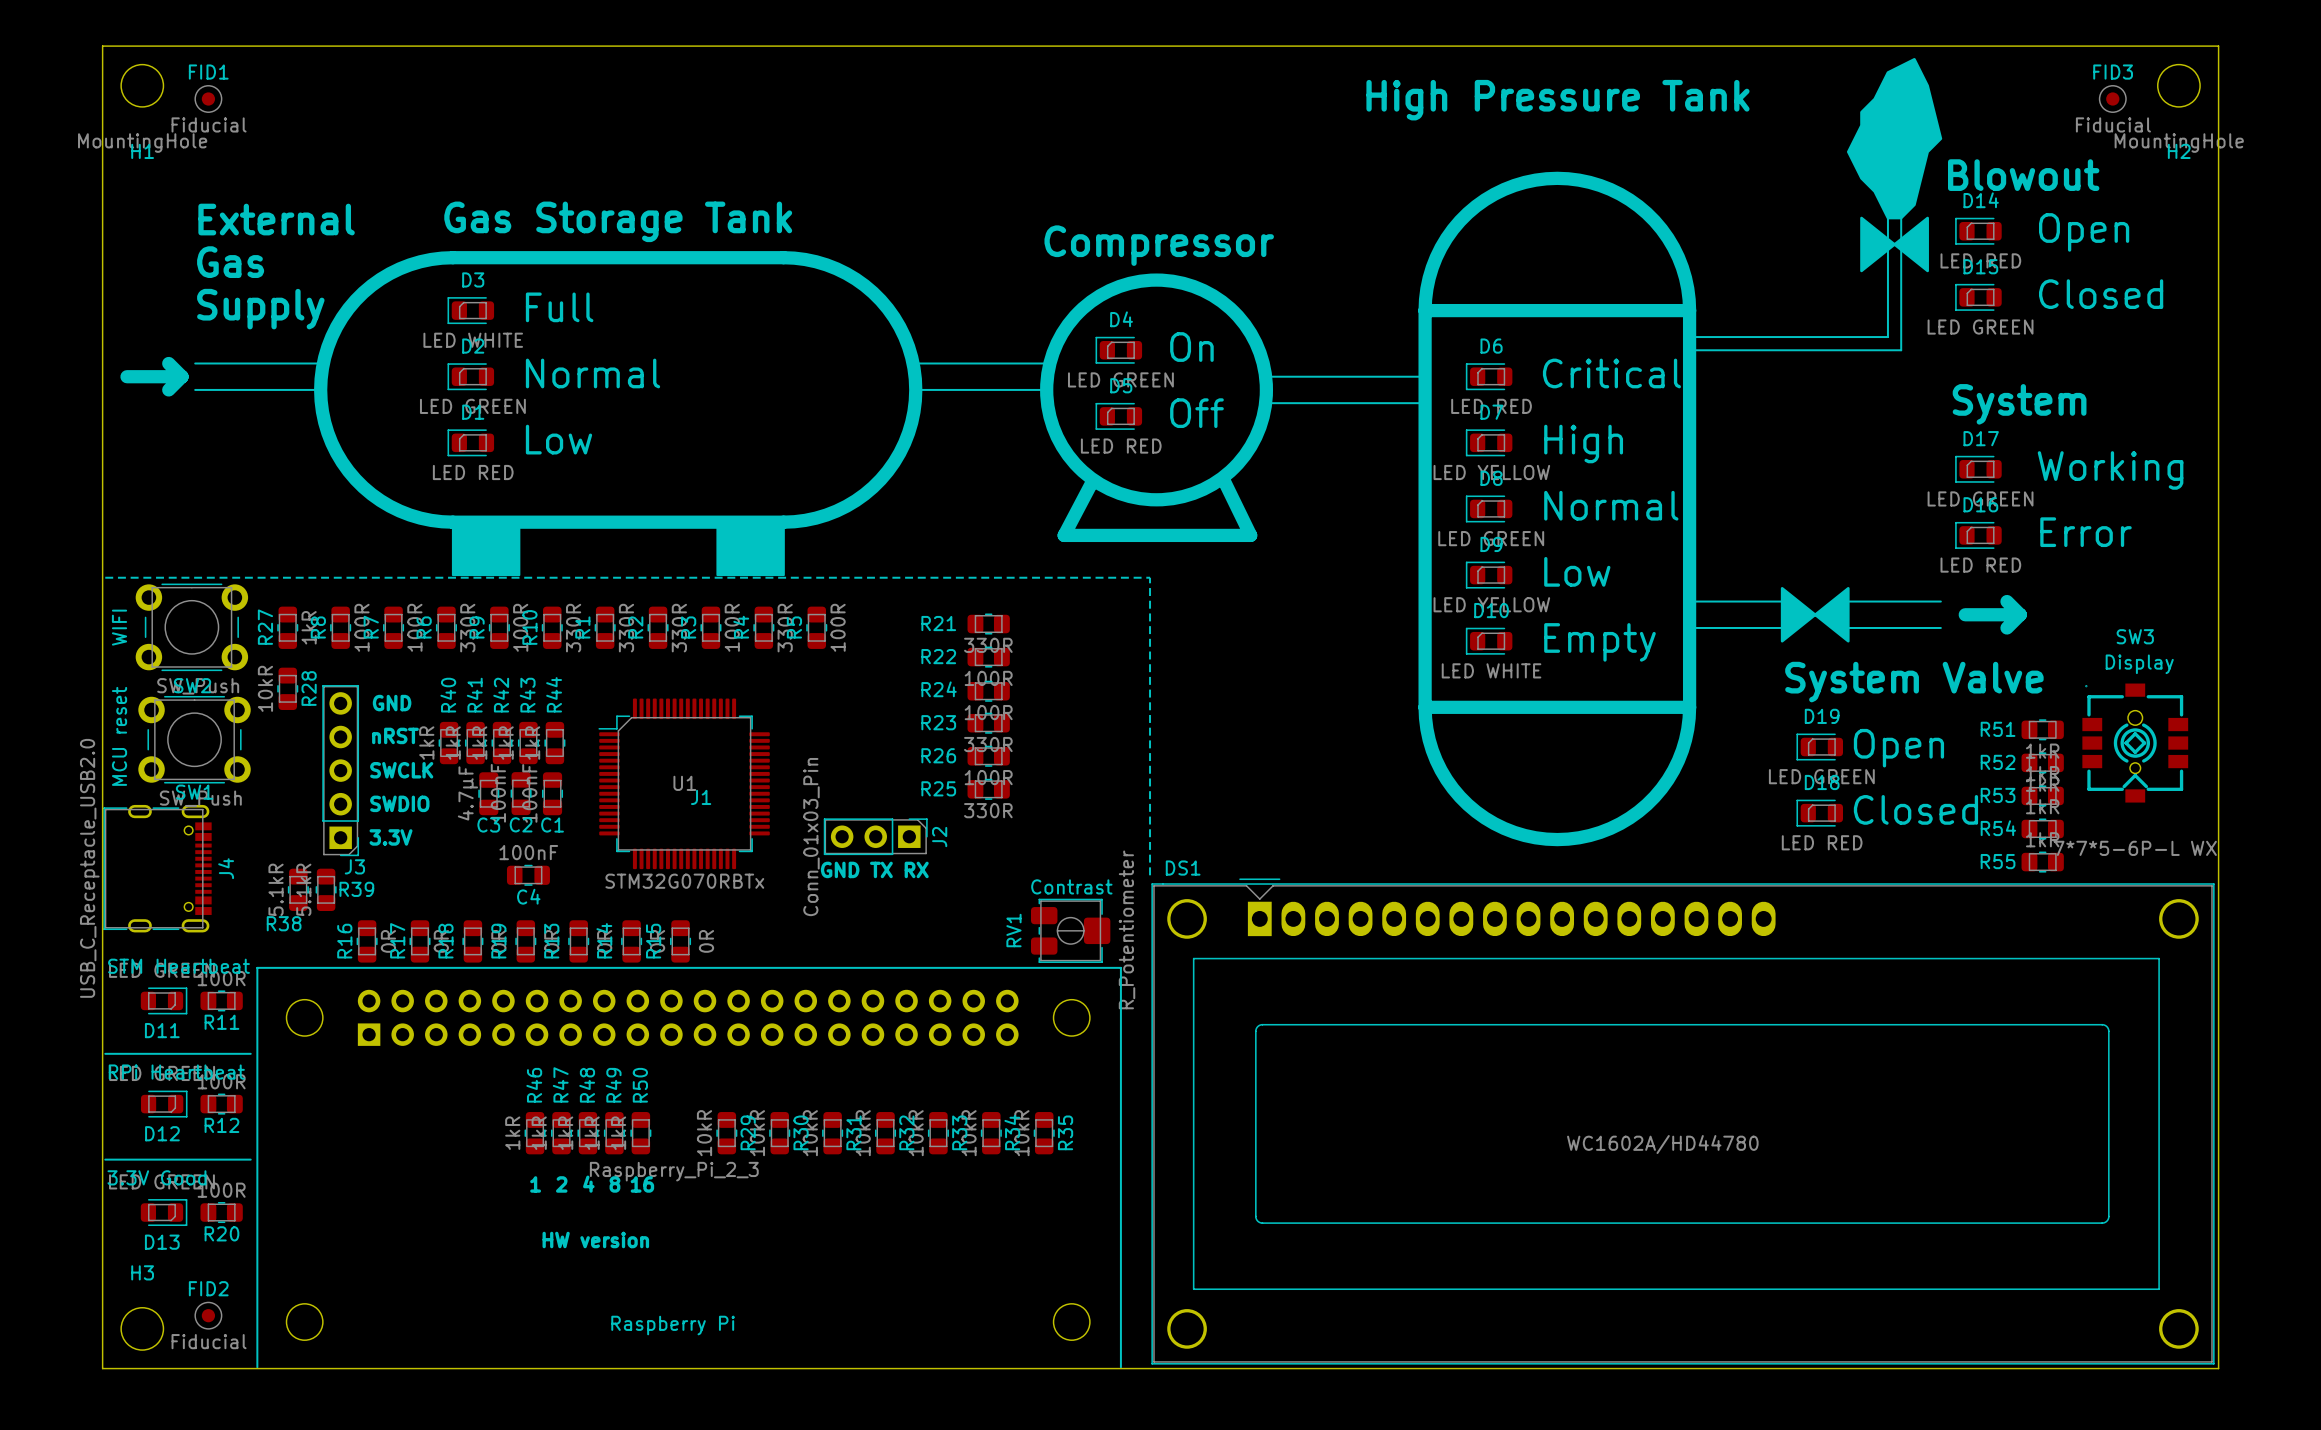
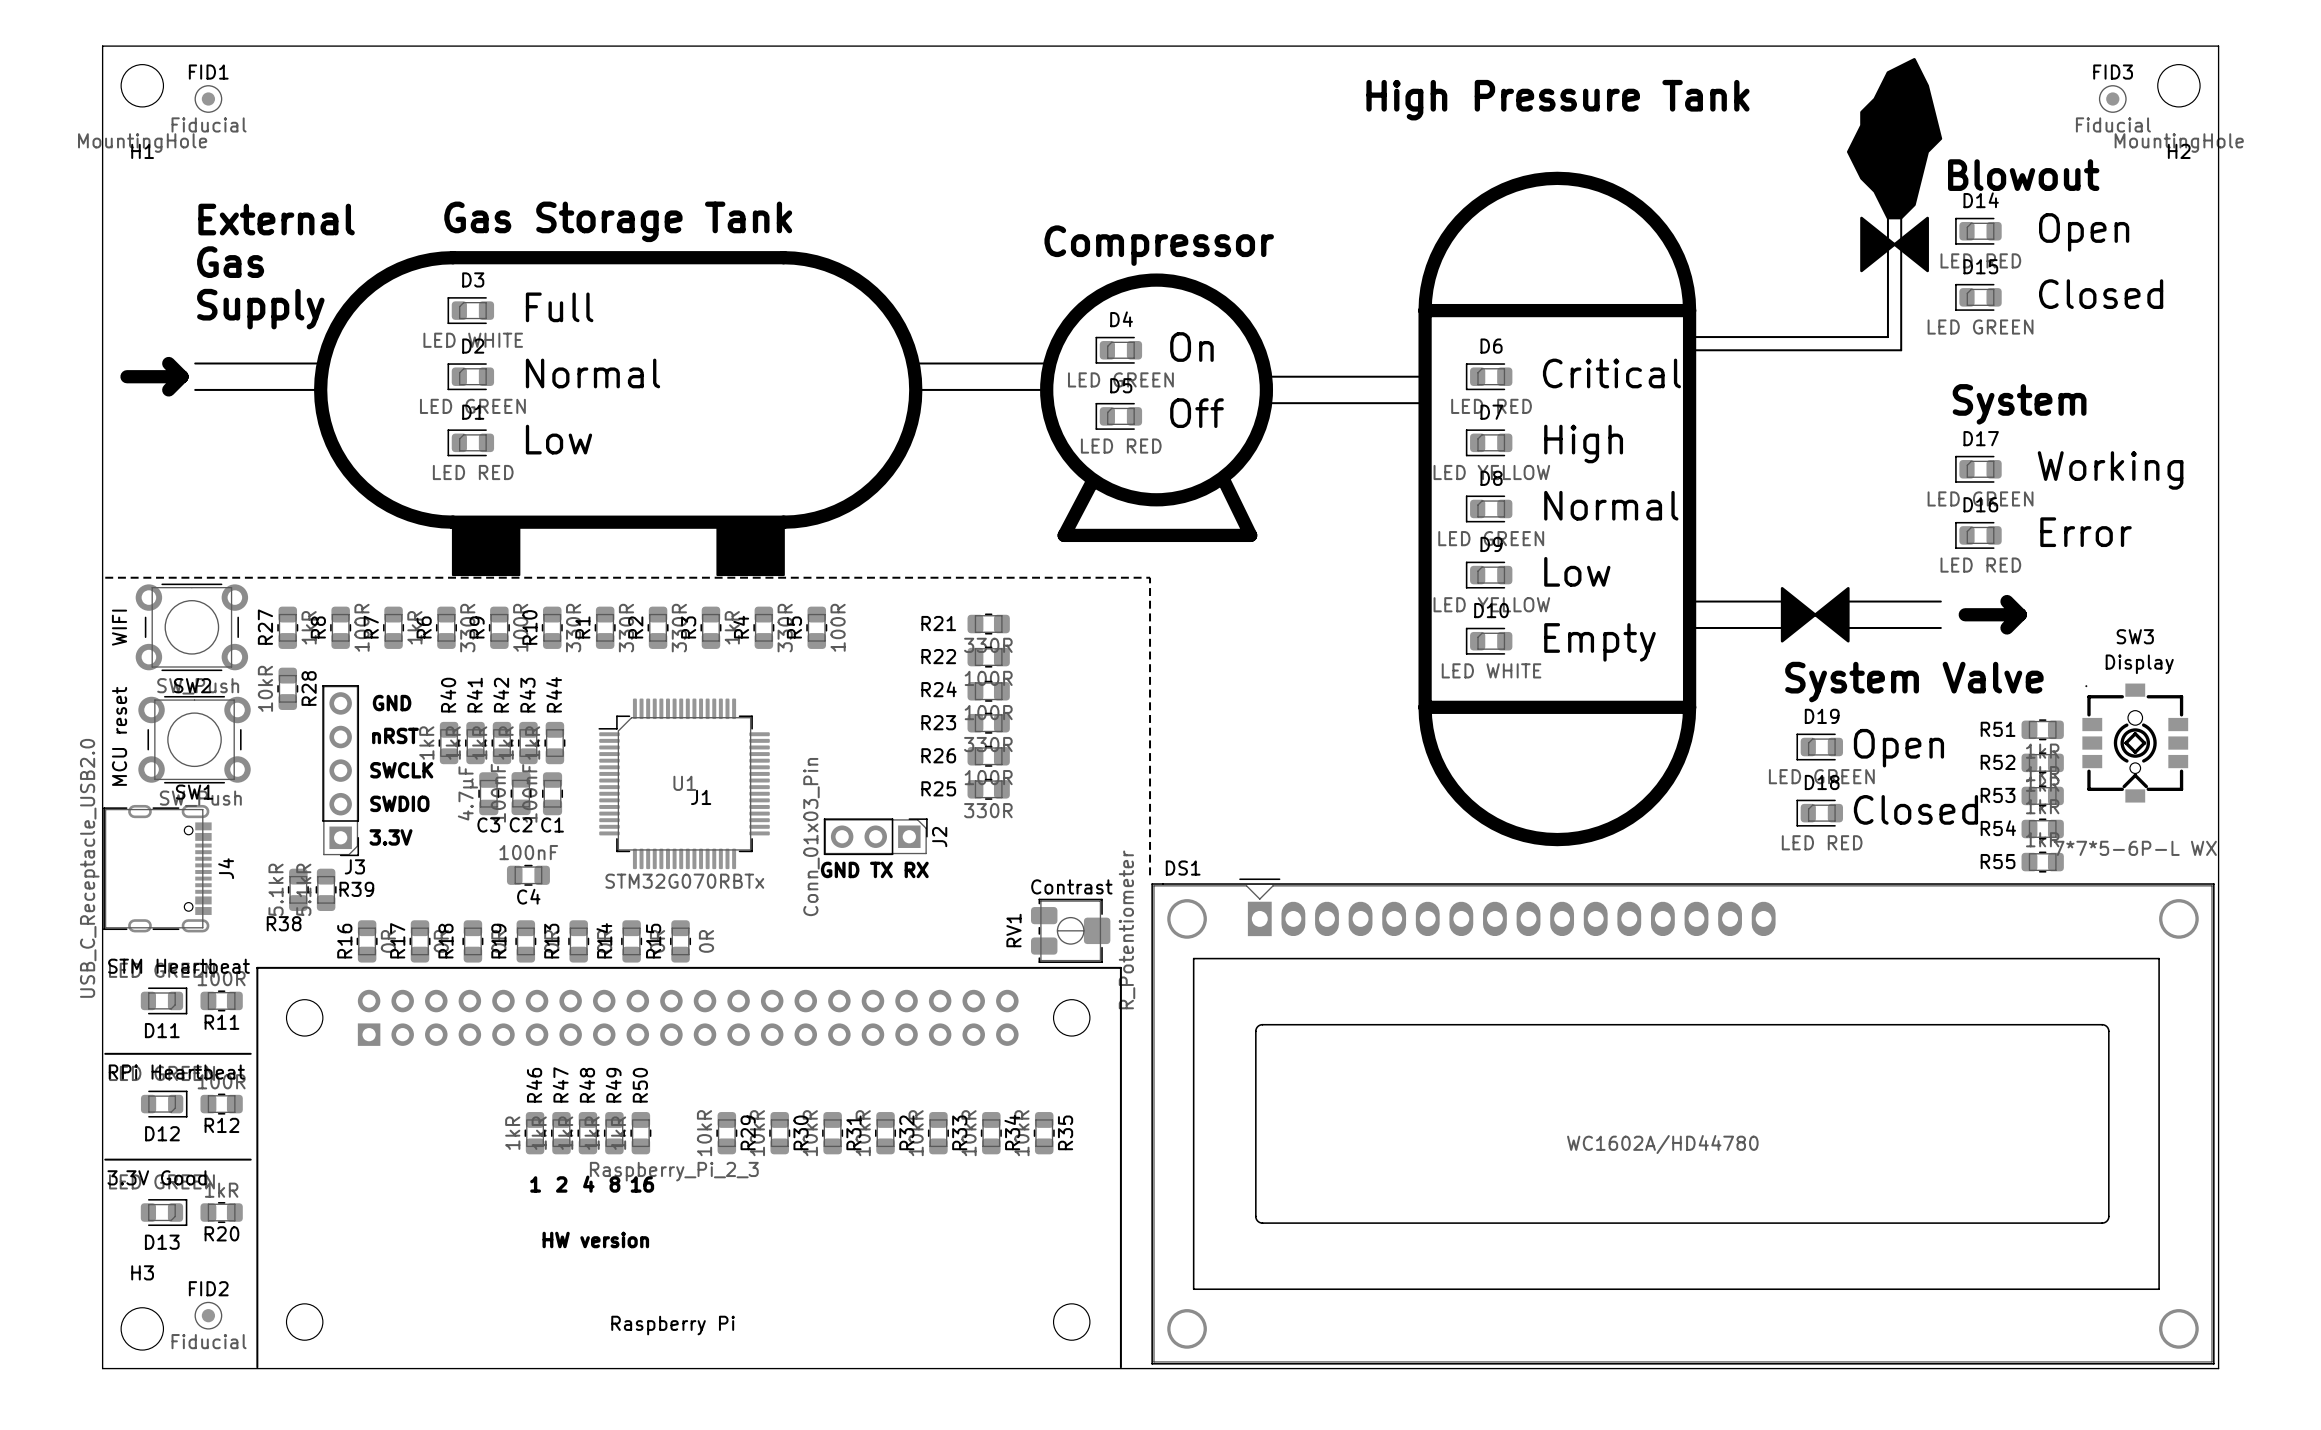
R7 value: 100R (414, 627) -> 1kR (414, 627)
R3 value: 100R (732, 627) -> 1kR (732, 627)
R20 value: 100R (221, 1190) -> 1kR (221, 1190)

